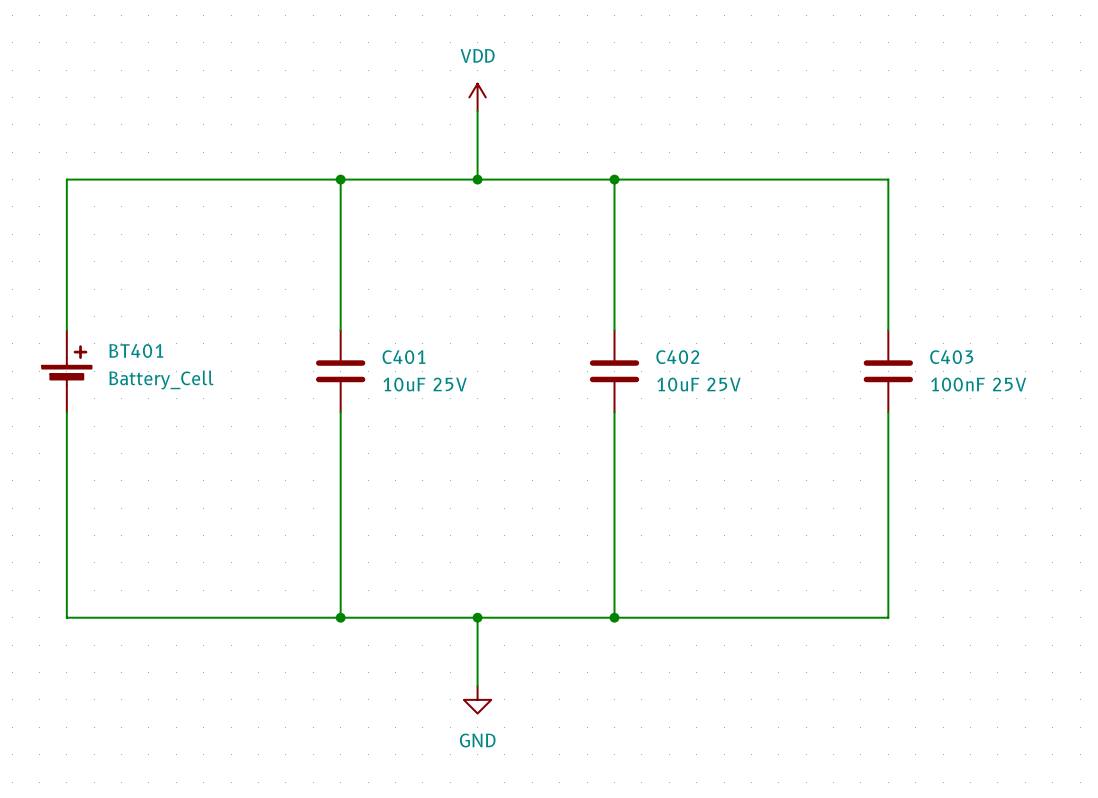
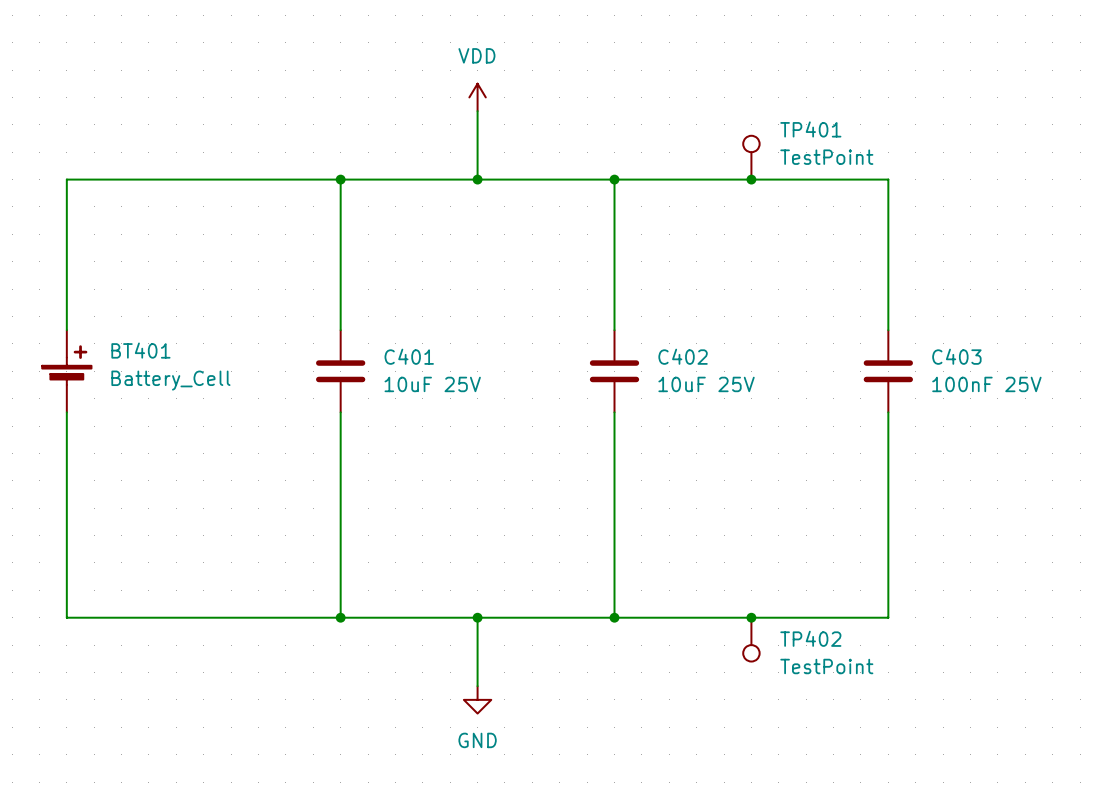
TP401: none -> TestPoint (751, 157)
junction: none -> (751, 179)
junction: none -> (751, 617)
TP402: none -> TestPoint (751, 639)

